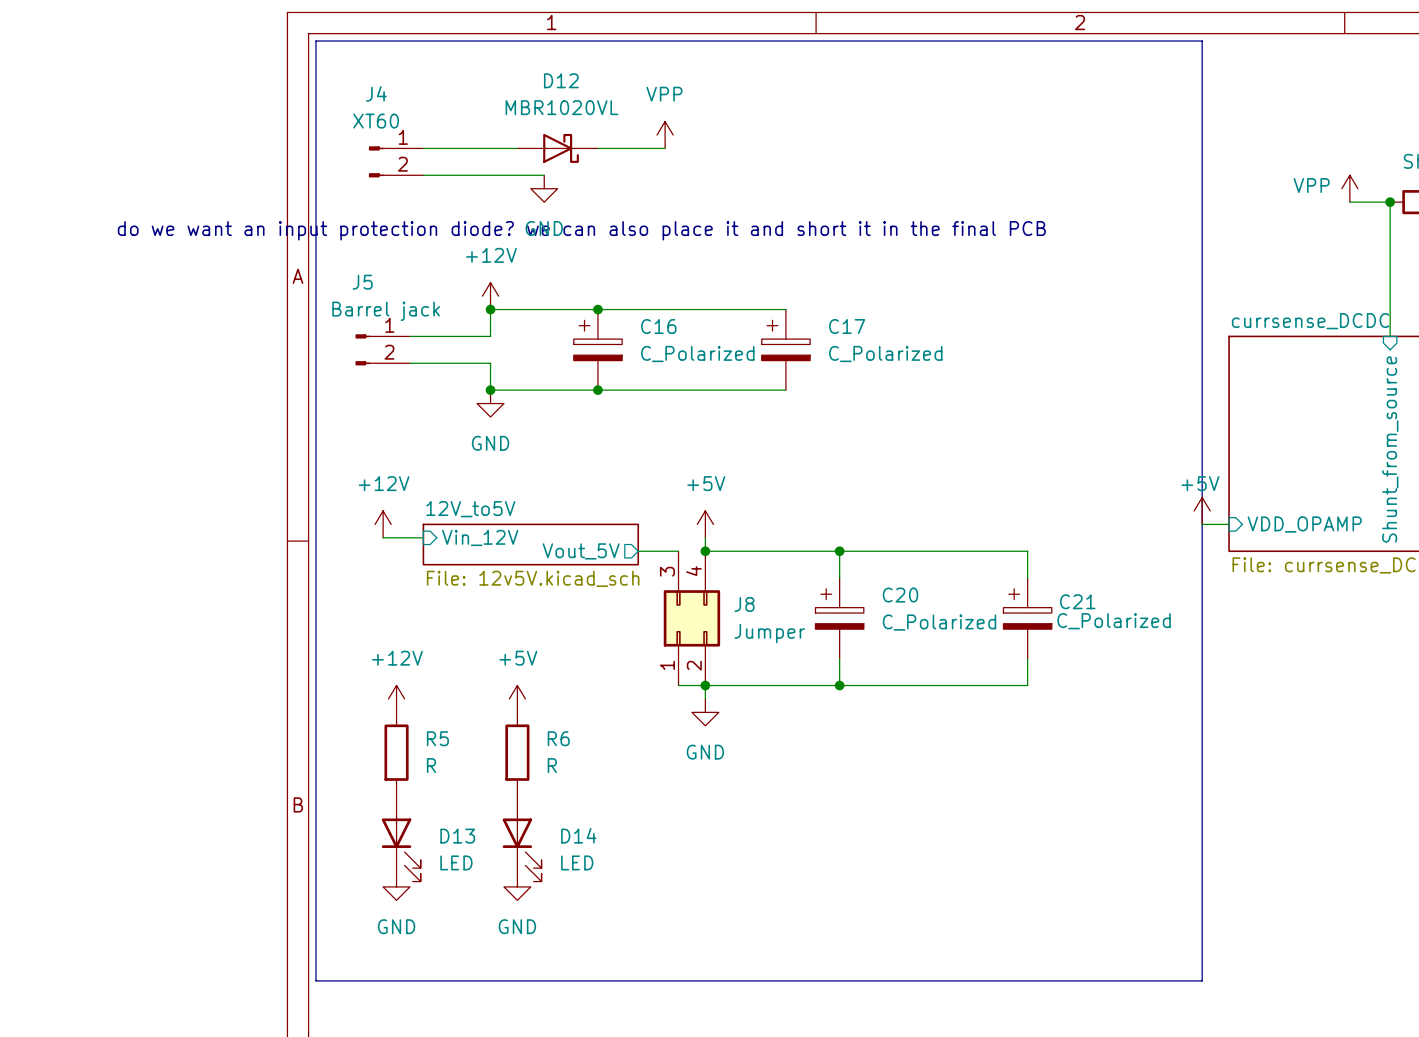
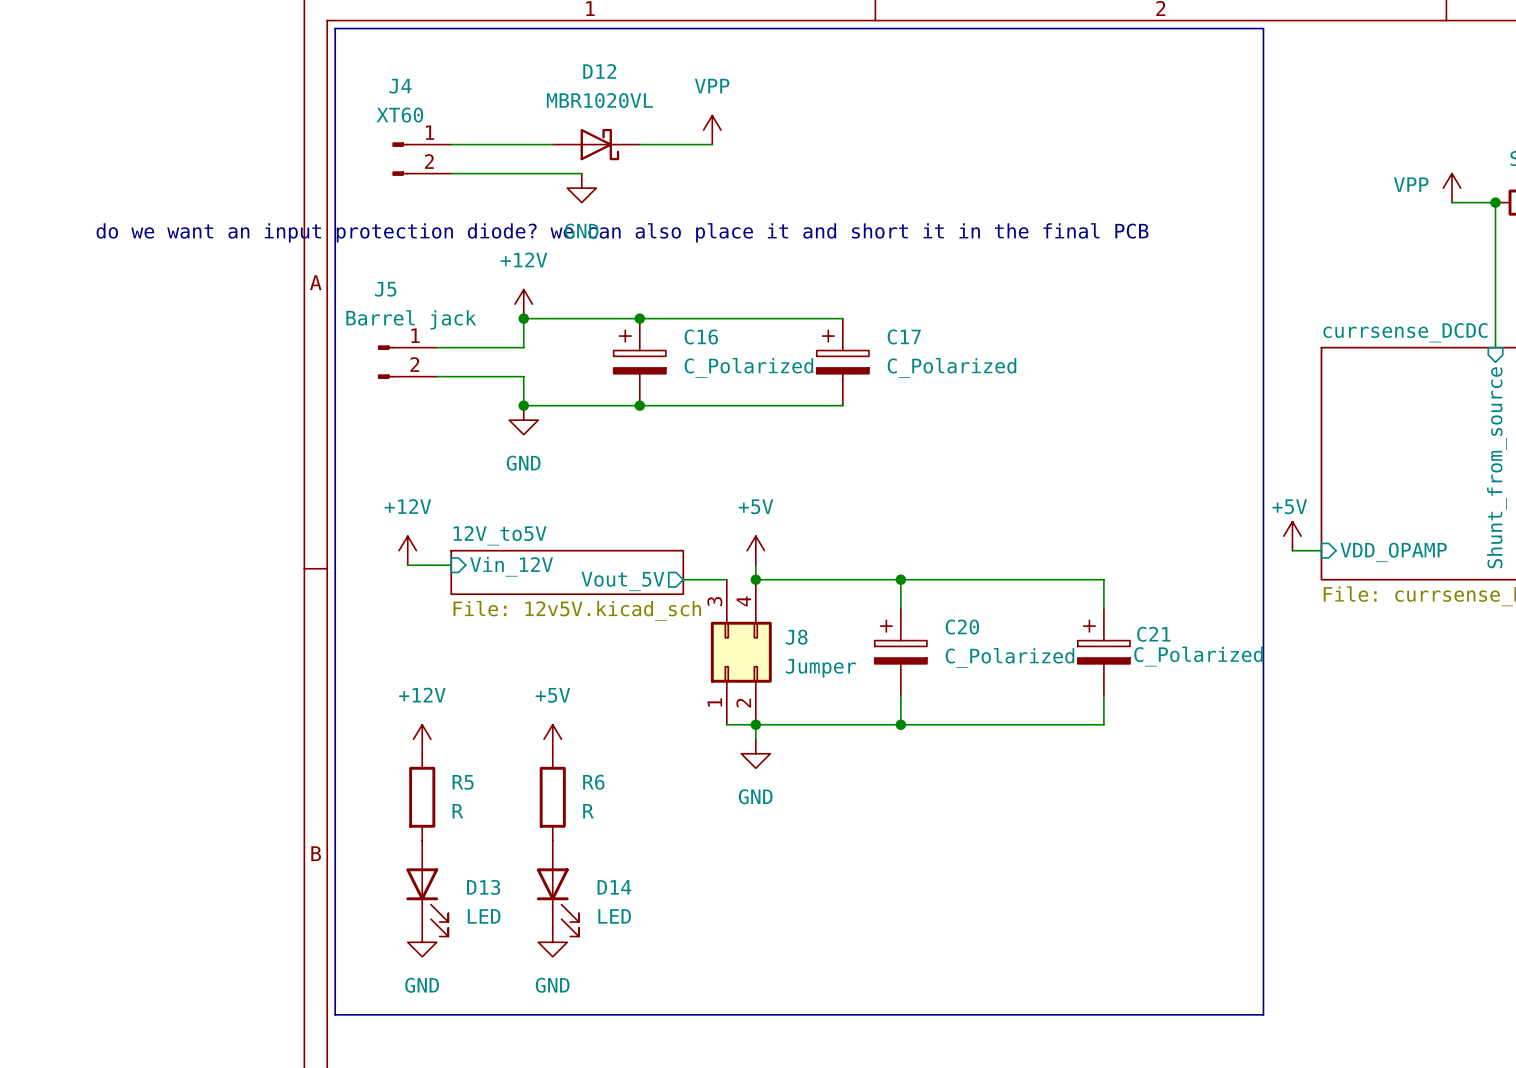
line: (1175, 41) (1202, 41) (1202, 980) (315, 980) (315, 954) -> (1263, 28) (1263, 1014) (335, 1014)

